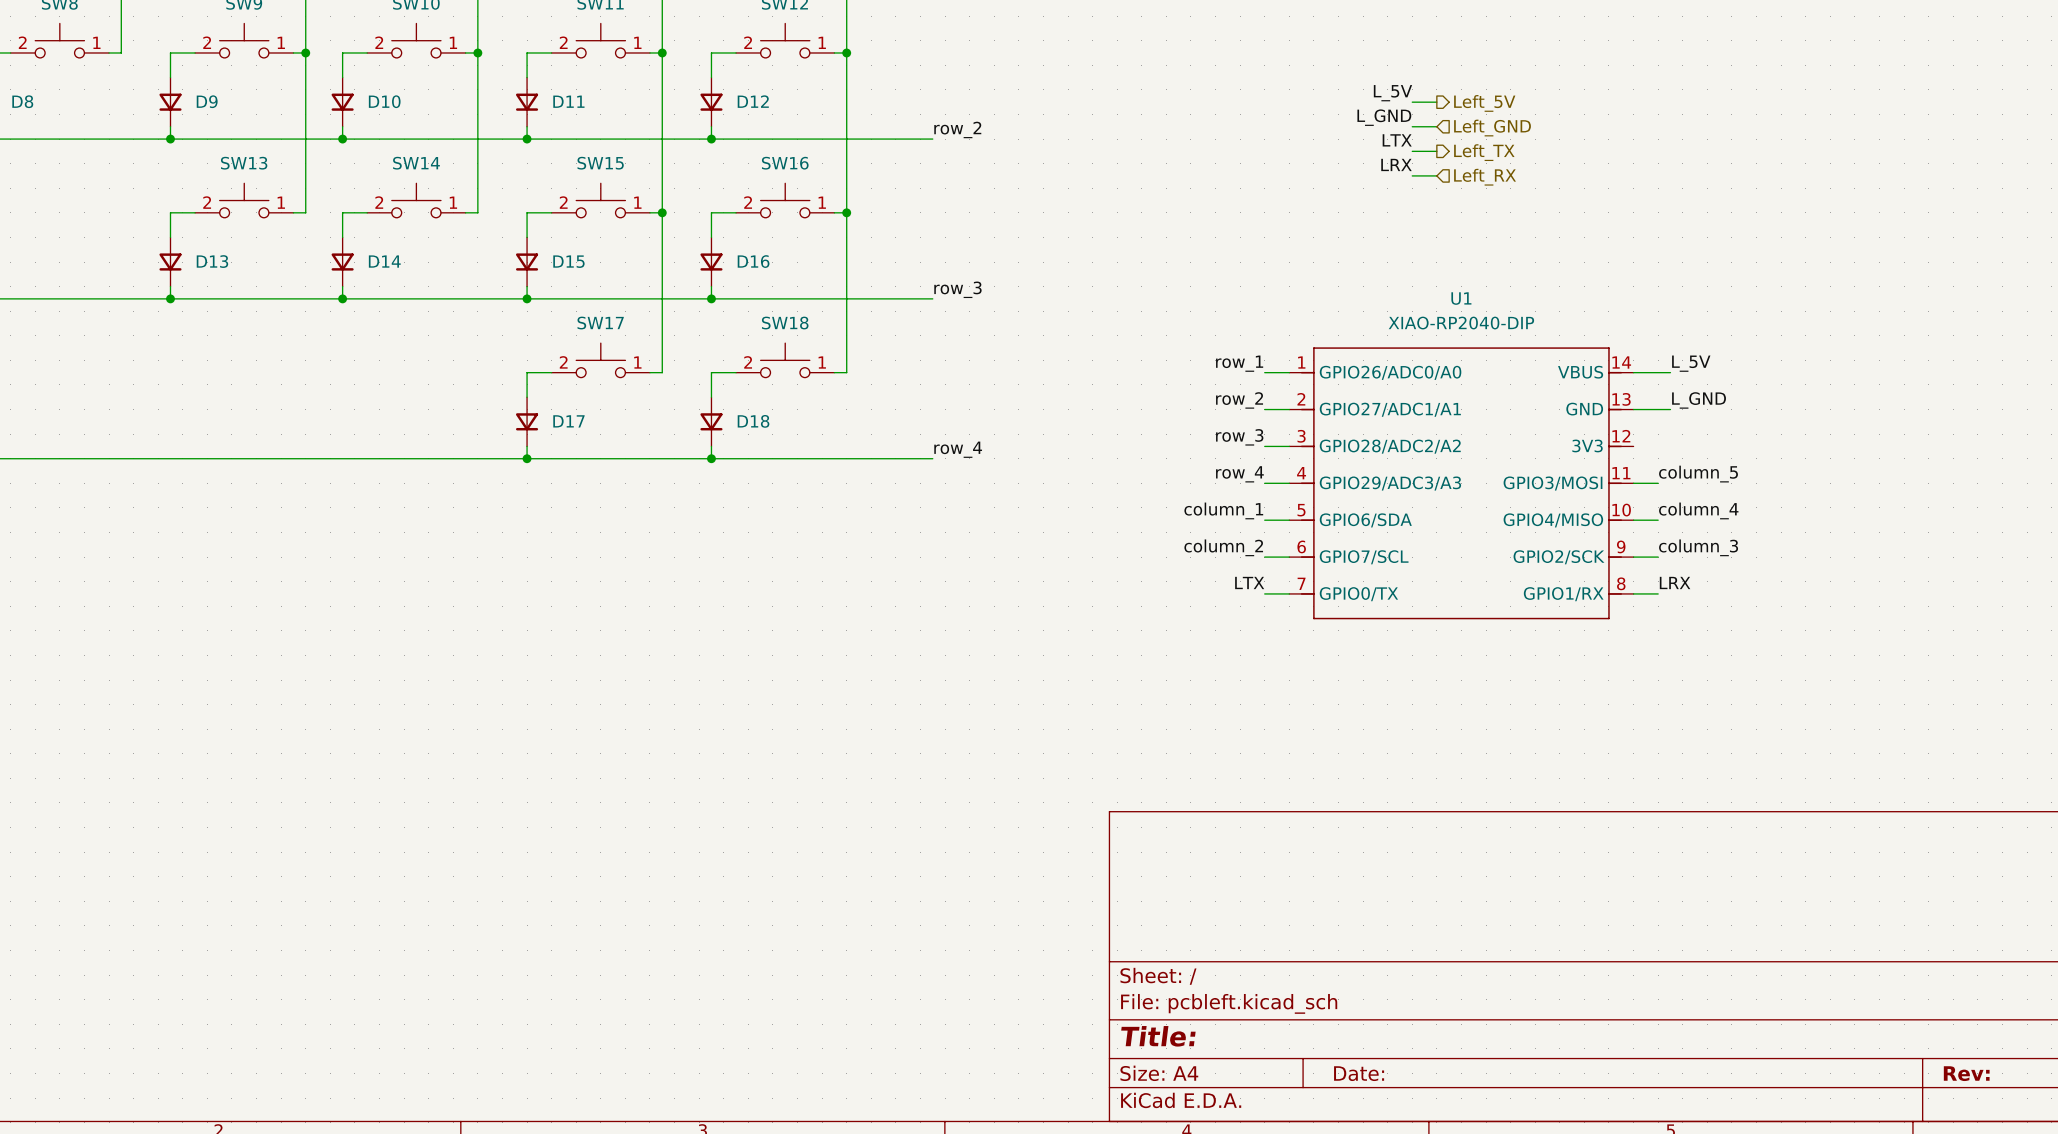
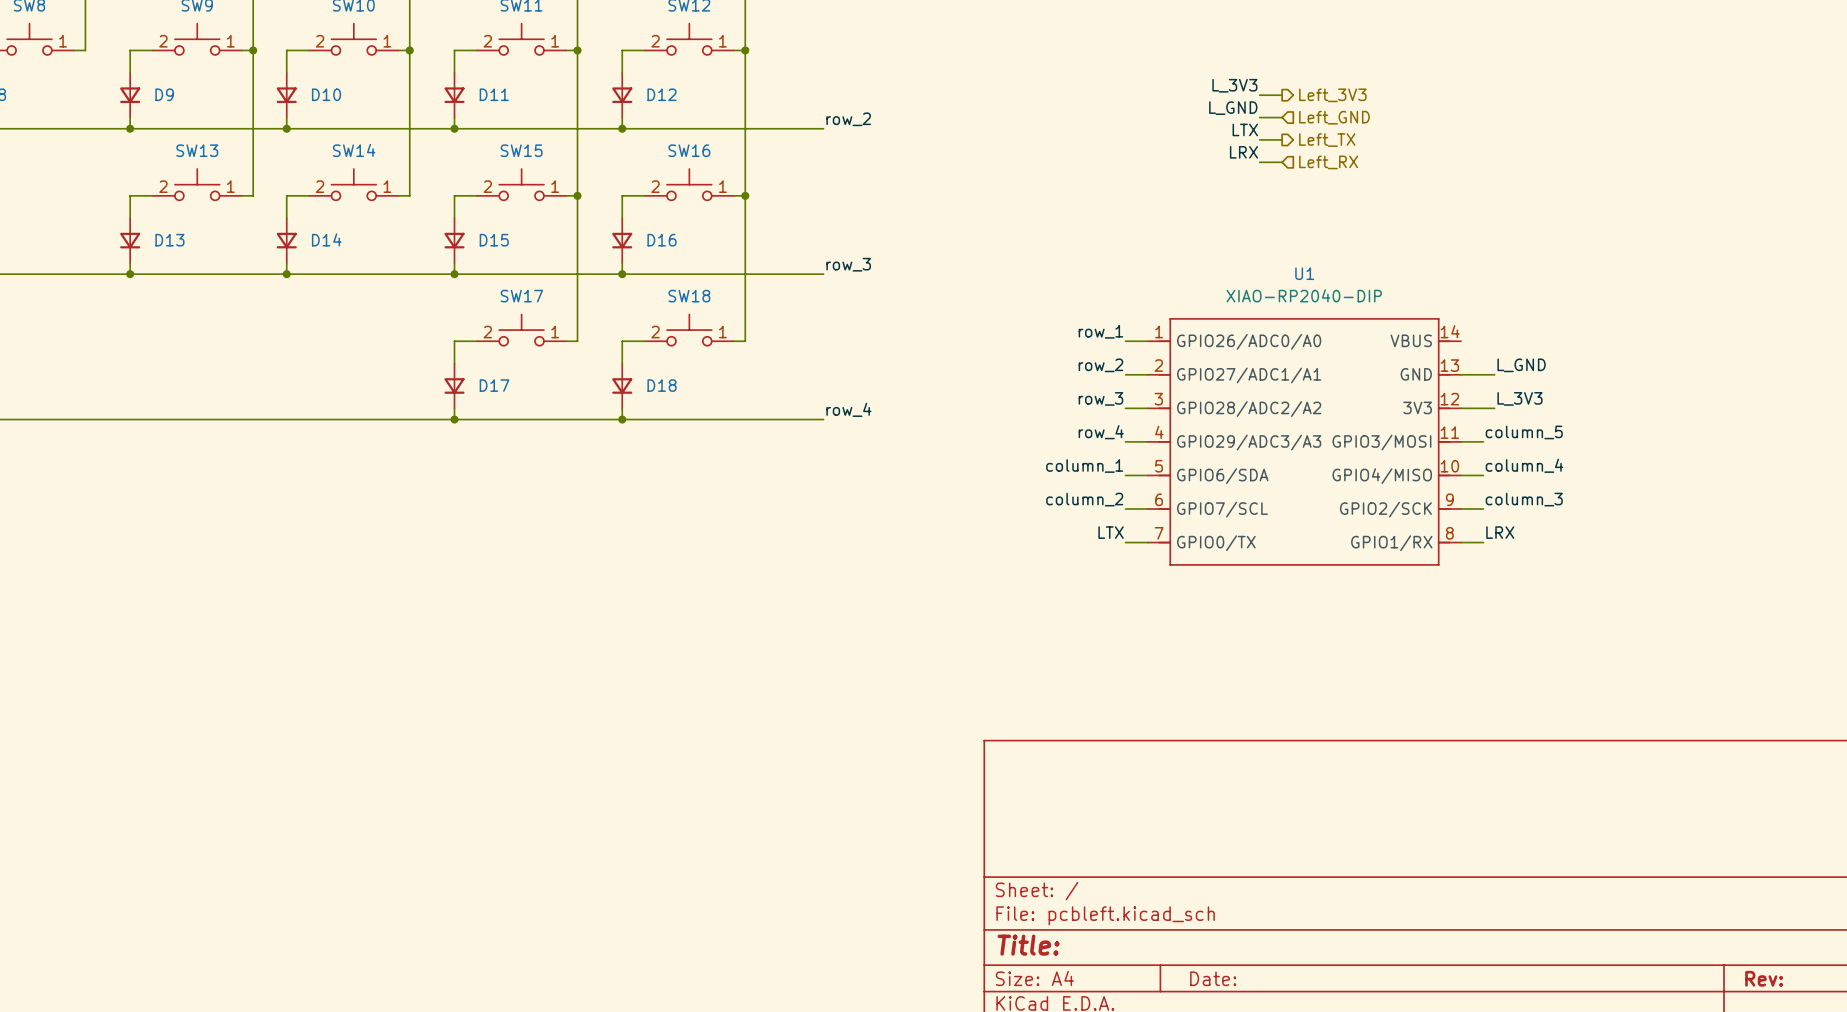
label: L_5V (1392, 93) -> L_3V3 (1234, 85)
hierarchical label: Left_5V (1484, 103) -> Left_3V3 (1332, 95)
label: L_5V (1691, 363) -> none
wire: (1633, 372) (1670, 372) -> (1461, 408) (1494, 408)
label: none -> L_3V3 (1519, 398)

